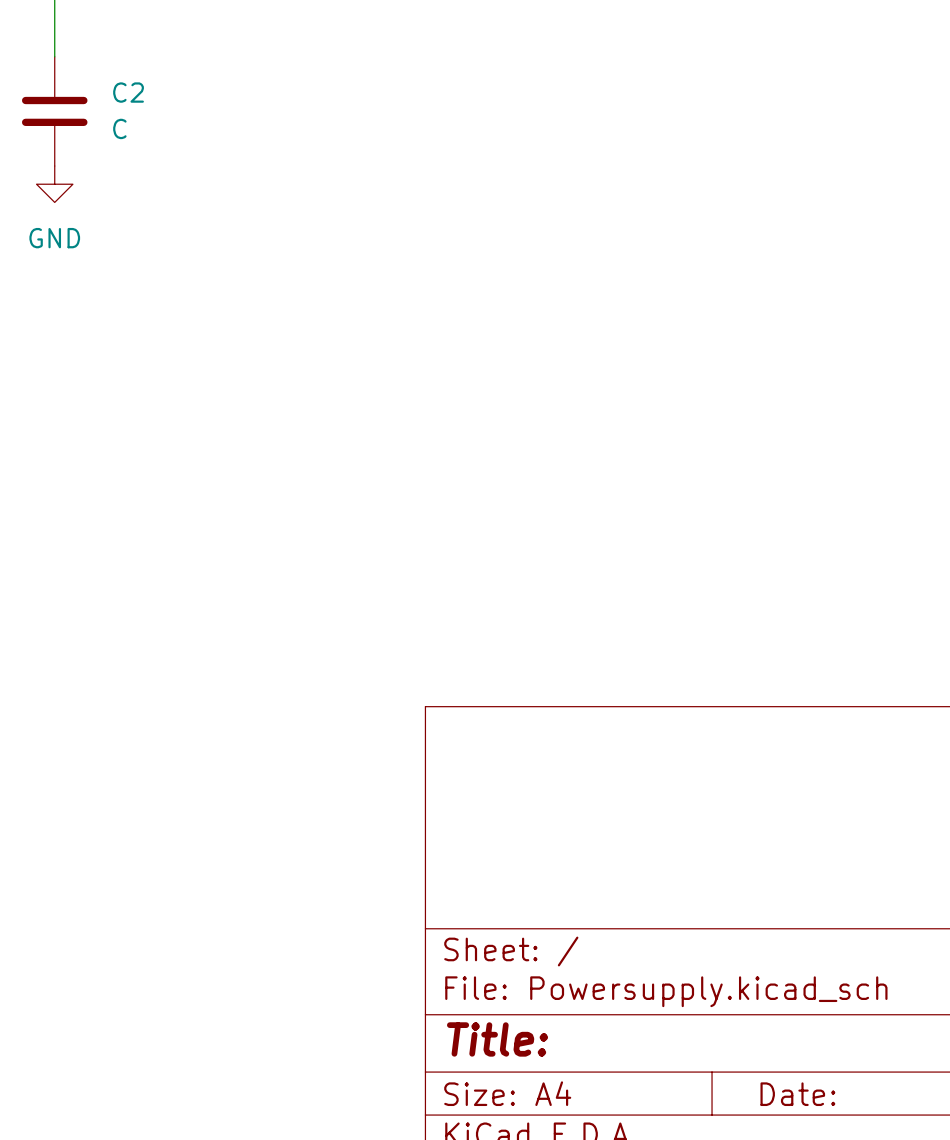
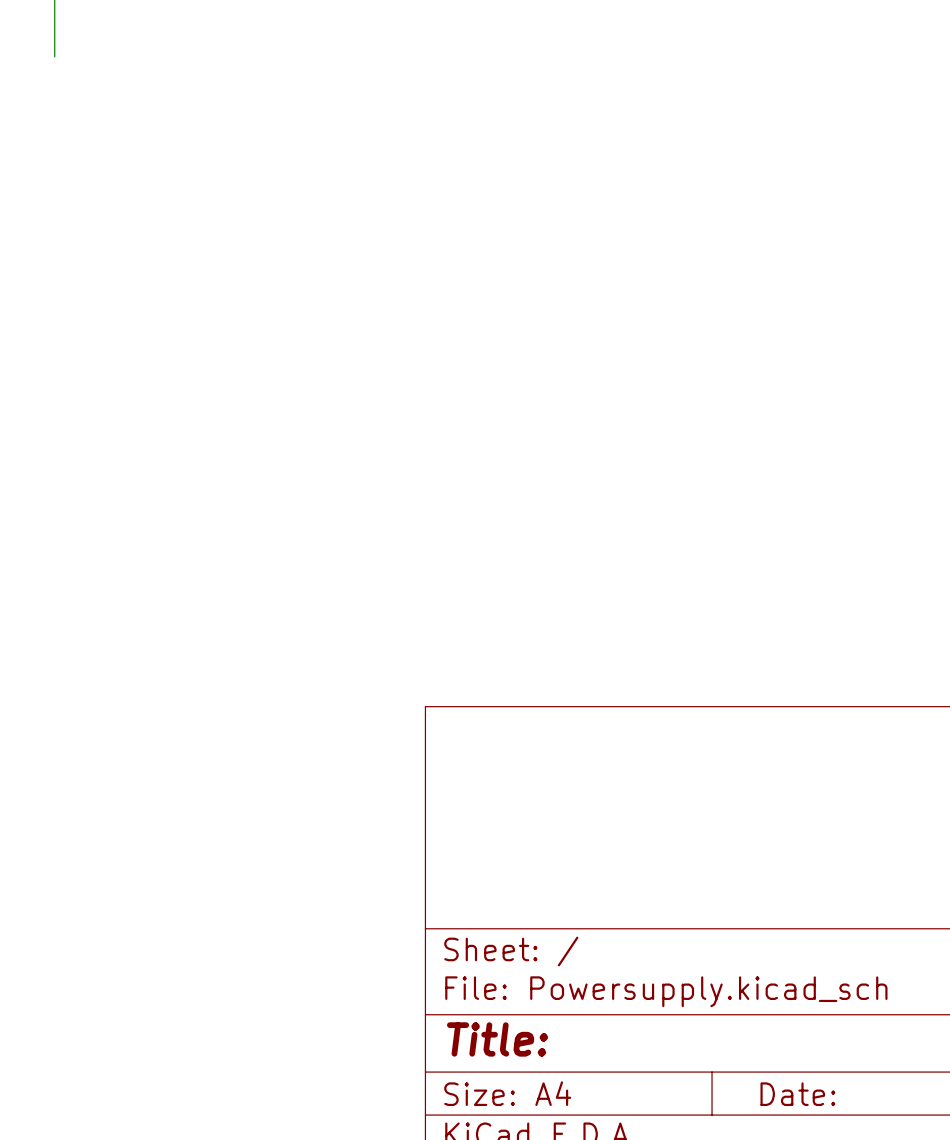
C2: C (54, 111) -> none
power symbol: GND (54, 184) -> none

